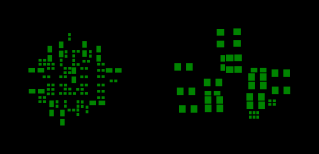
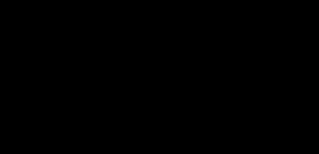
part: (69, 36) -> none
part: (237, 37) -> none
part: (220, 38) -> none
part: (84, 48) -> none
part: (61, 49) -> none
part: (75, 51) -> none
part: (49, 53) -> none
part: (90, 53) -> none
part: (98, 53) -> none
part: (66, 54) -> none
part: (73, 58) -> none
part: (42, 60) -> none
part: (86, 61) -> none
part: (61, 62) -> none
part: (222, 62) -> none
part: (229, 63) -> none
part: (238, 63) -> none
part: (42, 64) -> none
part: (50, 64) -> none
part: (75, 64) -> none
part: (100, 64) -> none
part: (183, 66) -> none
part: (50, 68) -> none
part: (67, 68) -> none
part: (84, 68) -> none
part: (36, 70) -> none
part: (100, 70) -> none
part: (113, 70) -> none
part: (258, 70) -> none
part: (67, 72) -> none
part: (280, 73) -> none
part: (73, 75) -> none
part: (46, 76) -> none
part: (63, 76) -> none
part: (84, 76) -> none
part: (100, 76) -> none
part: (257, 76) -> none
part: (113, 80) -> none
part: (213, 82) -> none
part: (50, 84) -> none
part: (63, 85) -> none
part: (84, 85) -> none
part: (100, 85) -> none
part: (257, 85) -> none
part: (50, 89) -> none
part: (67, 89) -> none
part: (79, 89) -> none
part: (281, 90) -> none
part: (36, 91) -> none
part: (100, 91) -> none
part: (186, 91) -> none
part: (50, 93) -> none
part: (62, 93) -> none
part: (72, 93) -> none
part: (84, 93) -> none
part: (212, 93) -> none
part: (255, 96) -> none
part: (42, 97) -> none
part: (100, 97) -> none
part: (213, 99) -> none
part: (272, 100) -> none
part: (42, 101) -> none
part: (97, 102) -> none
part: (65, 103) -> none
part: (57, 104) -> none
part: (77, 104) -> none
part: (82, 104) -> none
part: (272, 104) -> none
part: (255, 105) -> none
part: (51, 108) -> none
part: (188, 108) -> none
part: (213, 108) -> none
part: (87, 109) -> none
part: (71, 110) -> none
part: (77, 112) -> none
part: (250, 114) -> none
part: (254, 114) -> none
part: (257, 114) -> none
part: (62, 117) -> none

